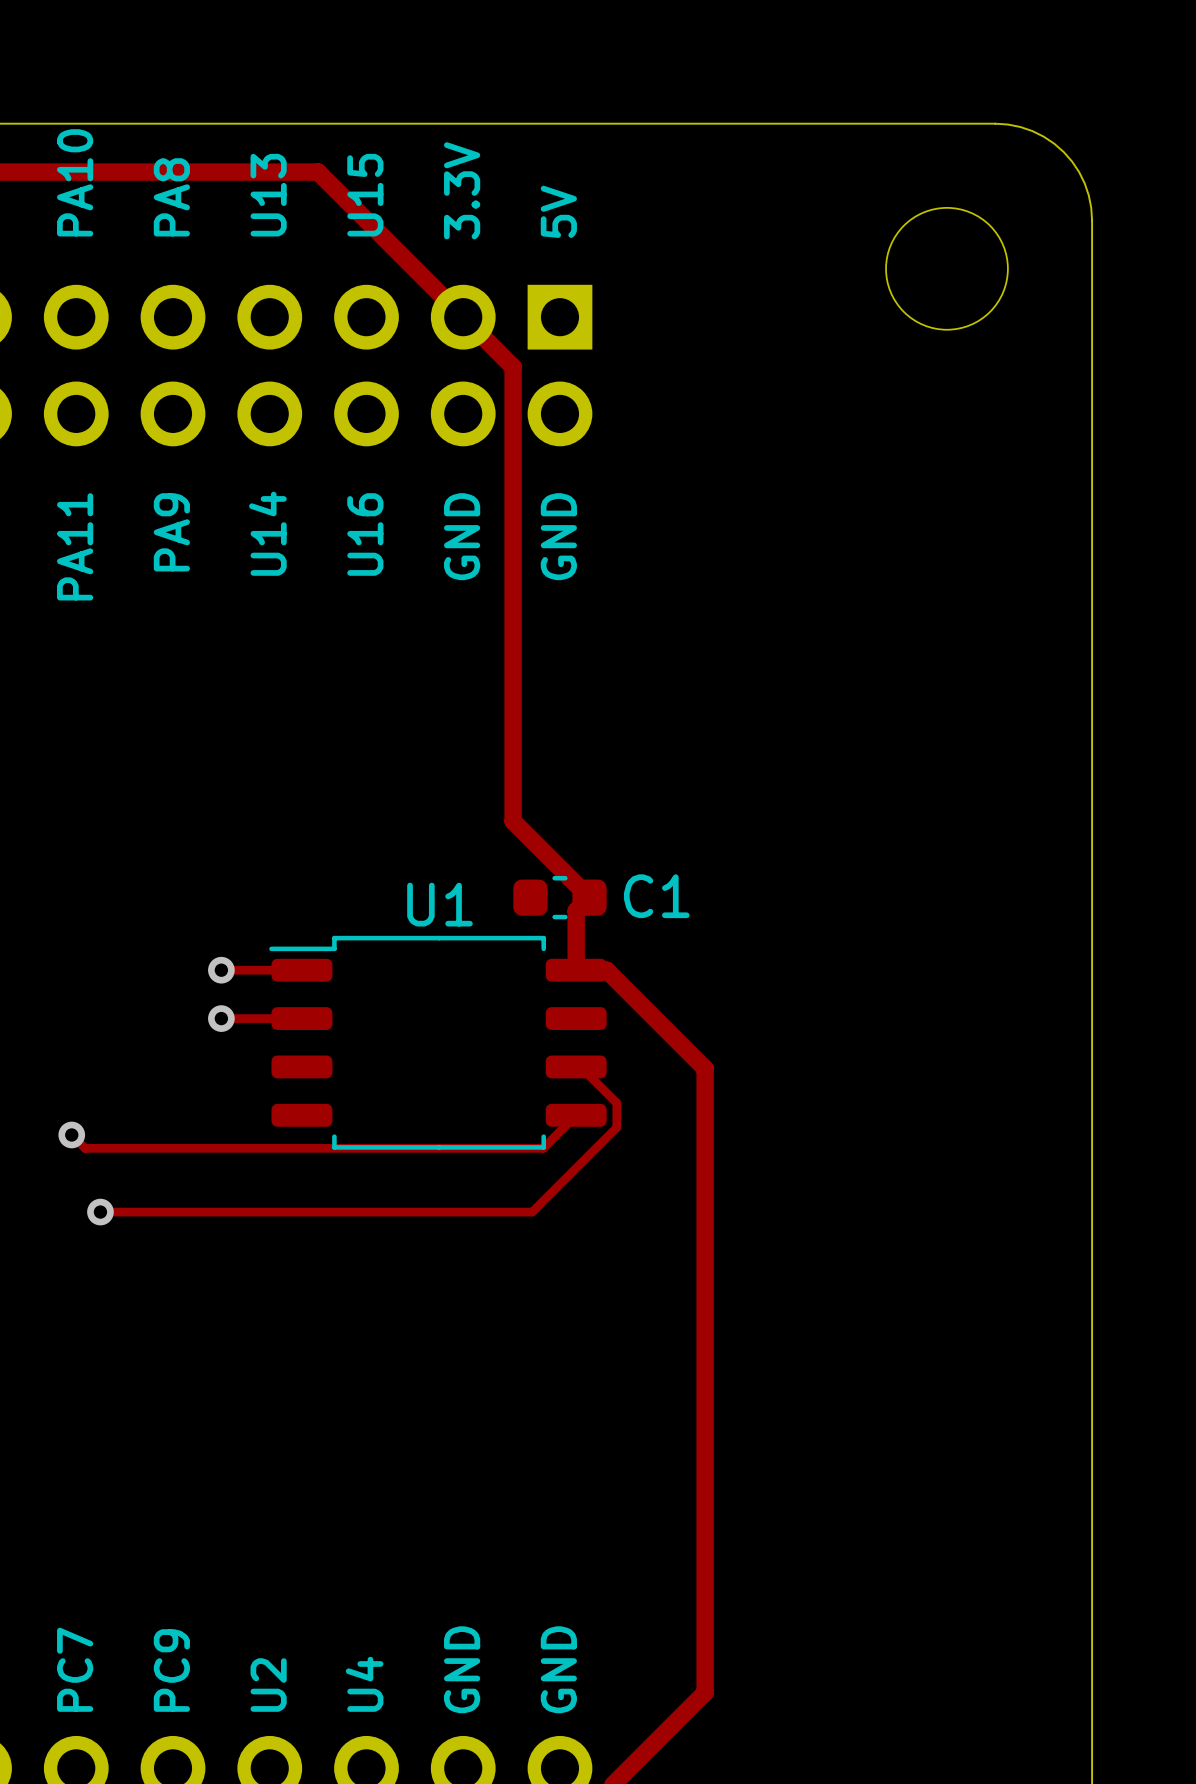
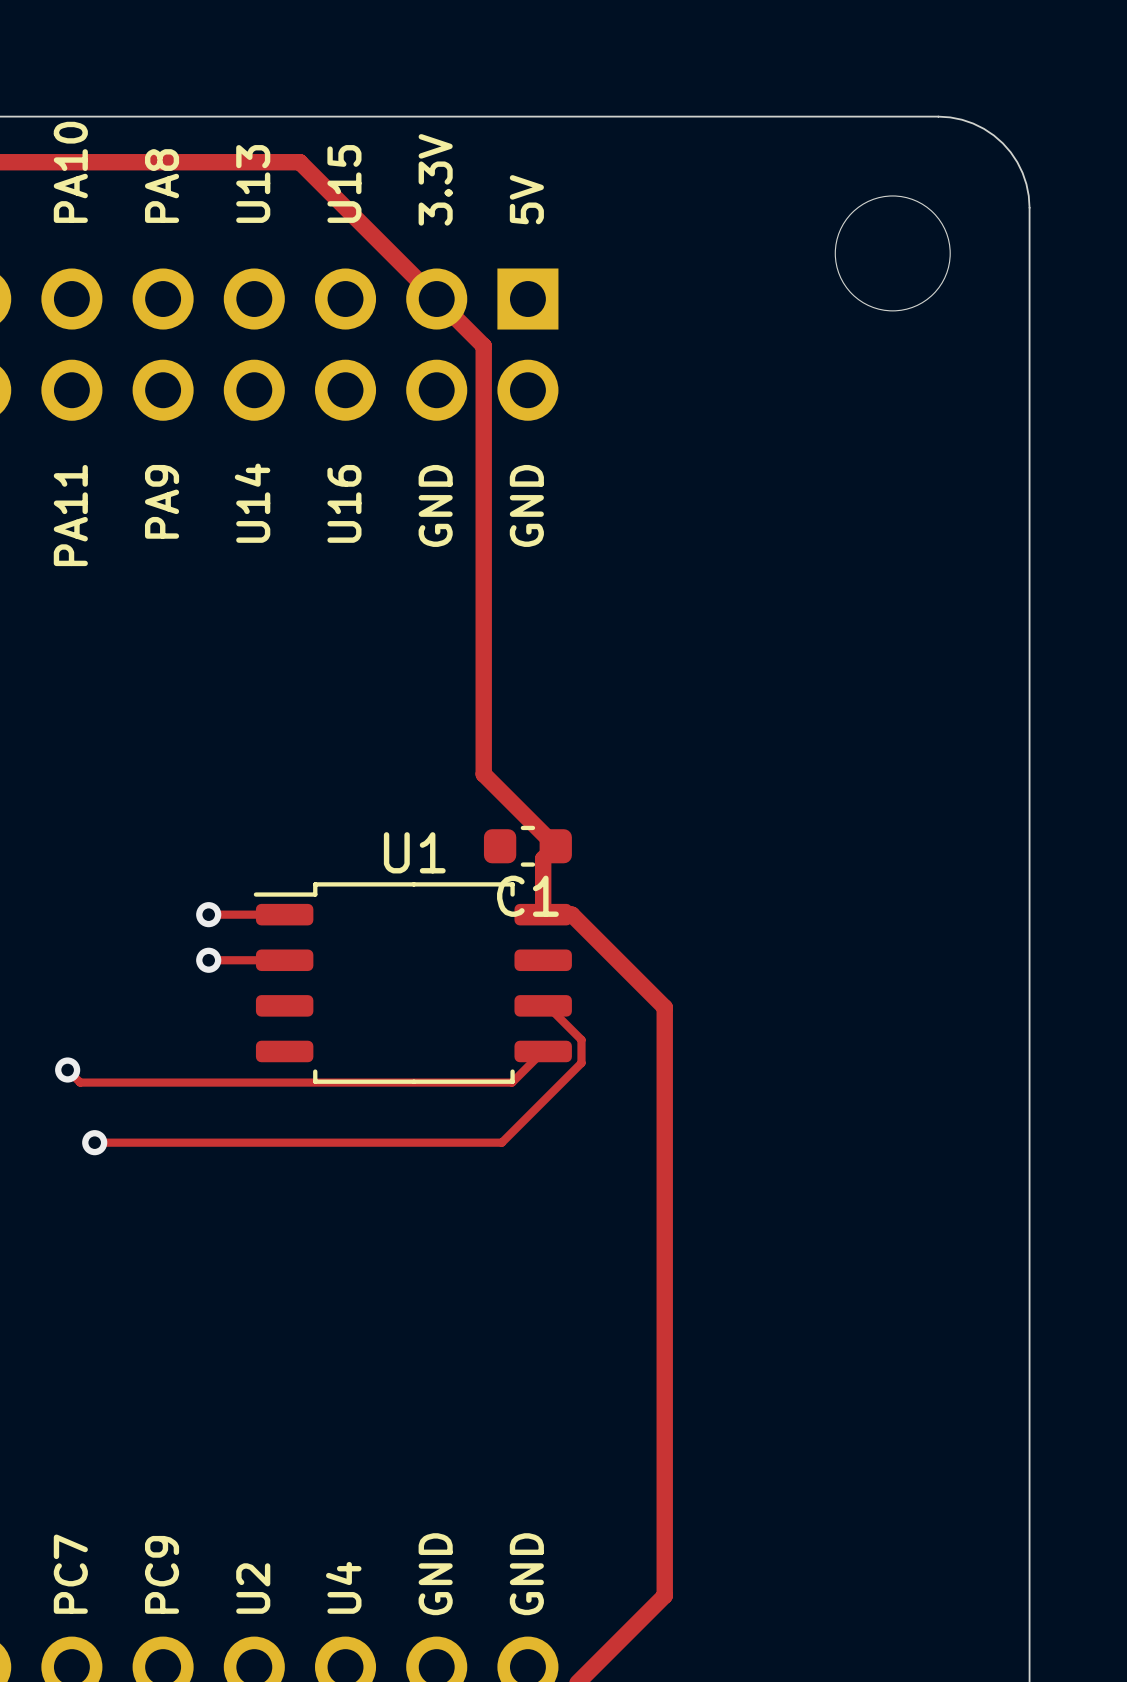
C1 name position: C1 (656, 896) -> C1 (527, 896)

